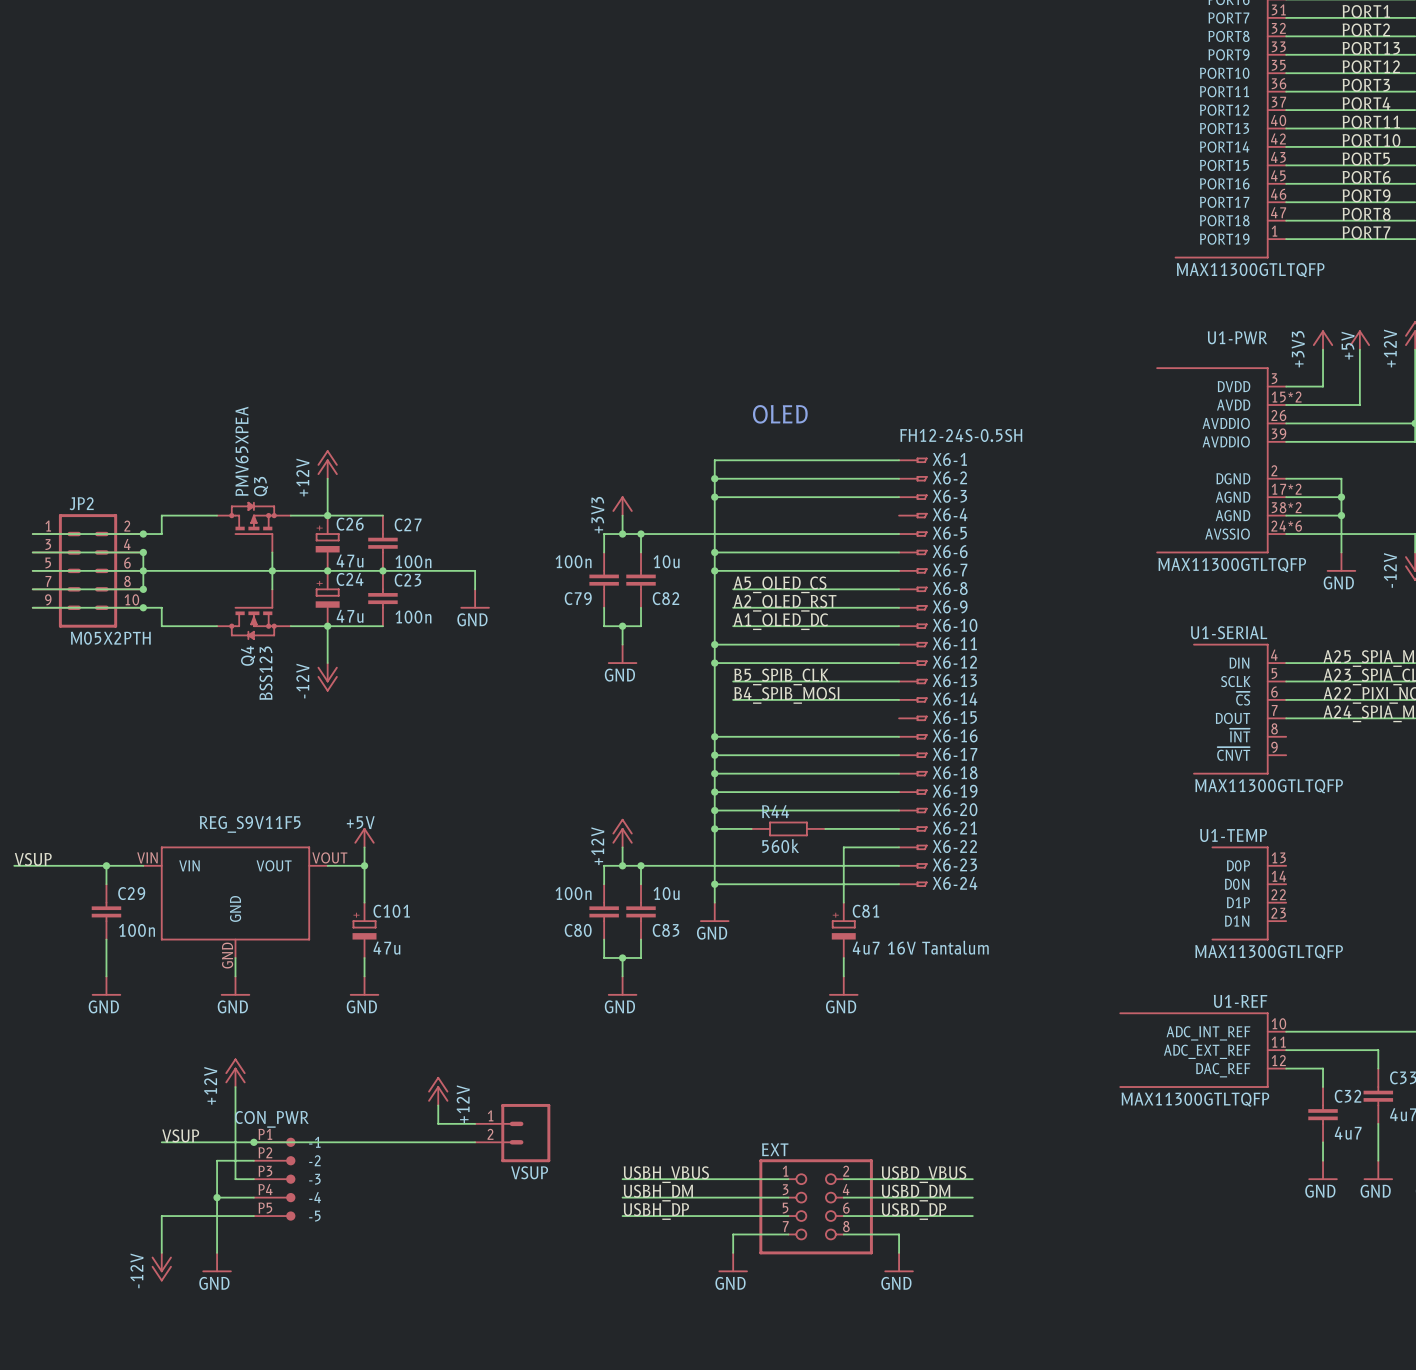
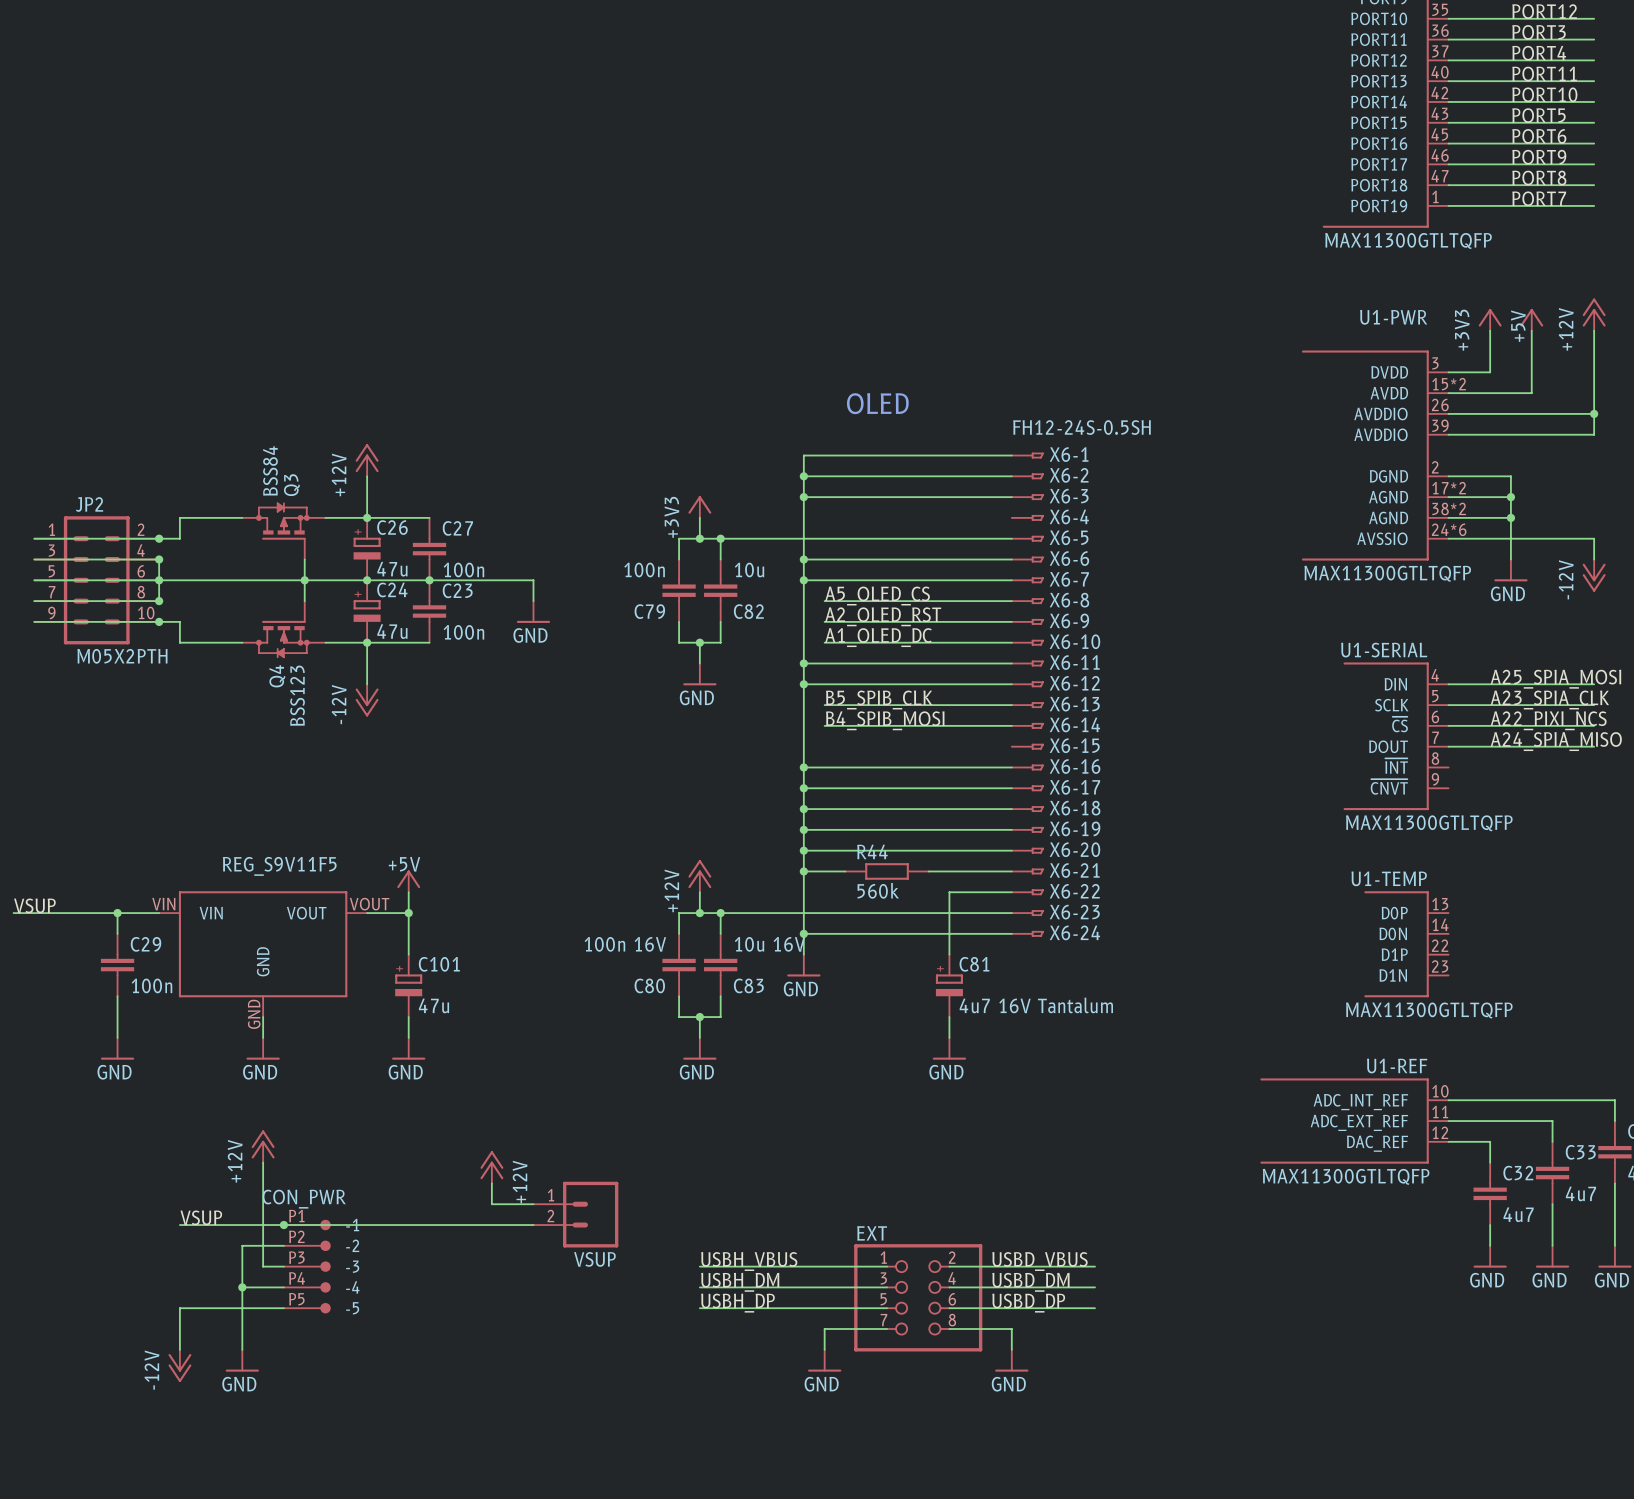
Q3 value: PMV65XPEA (242, 451) -> BSS84 (270, 471)
C80 value: 100n (573, 893) -> 100n 16V (625, 944)
C83 value: 10u (666, 893) -> 10u 16V (769, 944)

